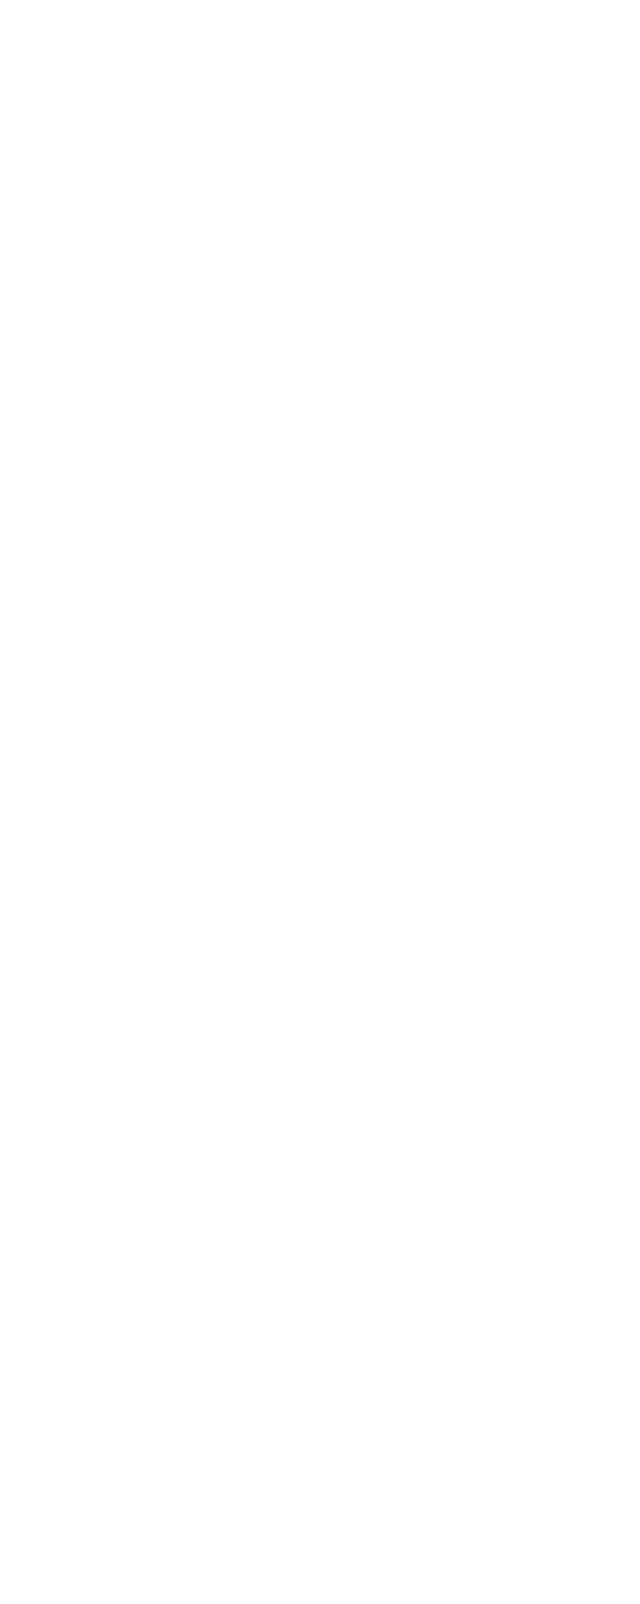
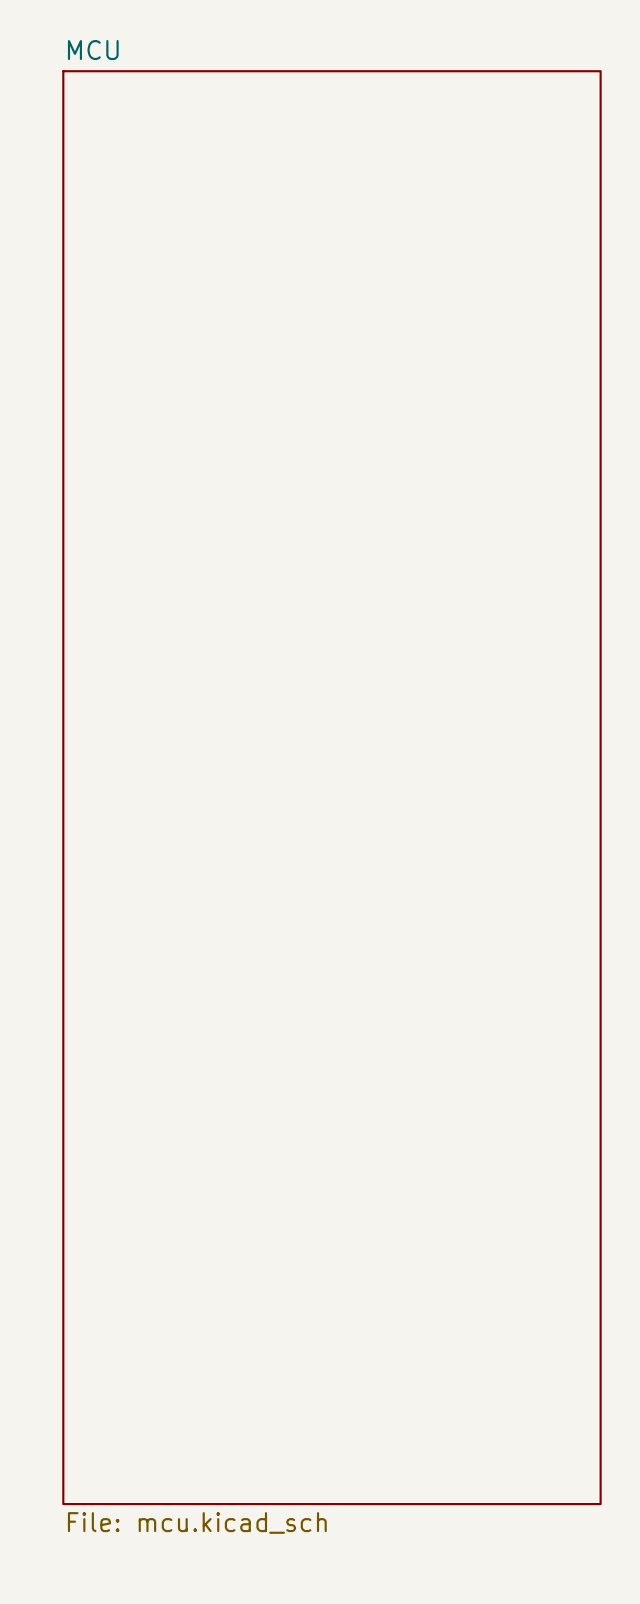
sheet MCU: none -> File: mcu.kicad_sch (331, 787)

